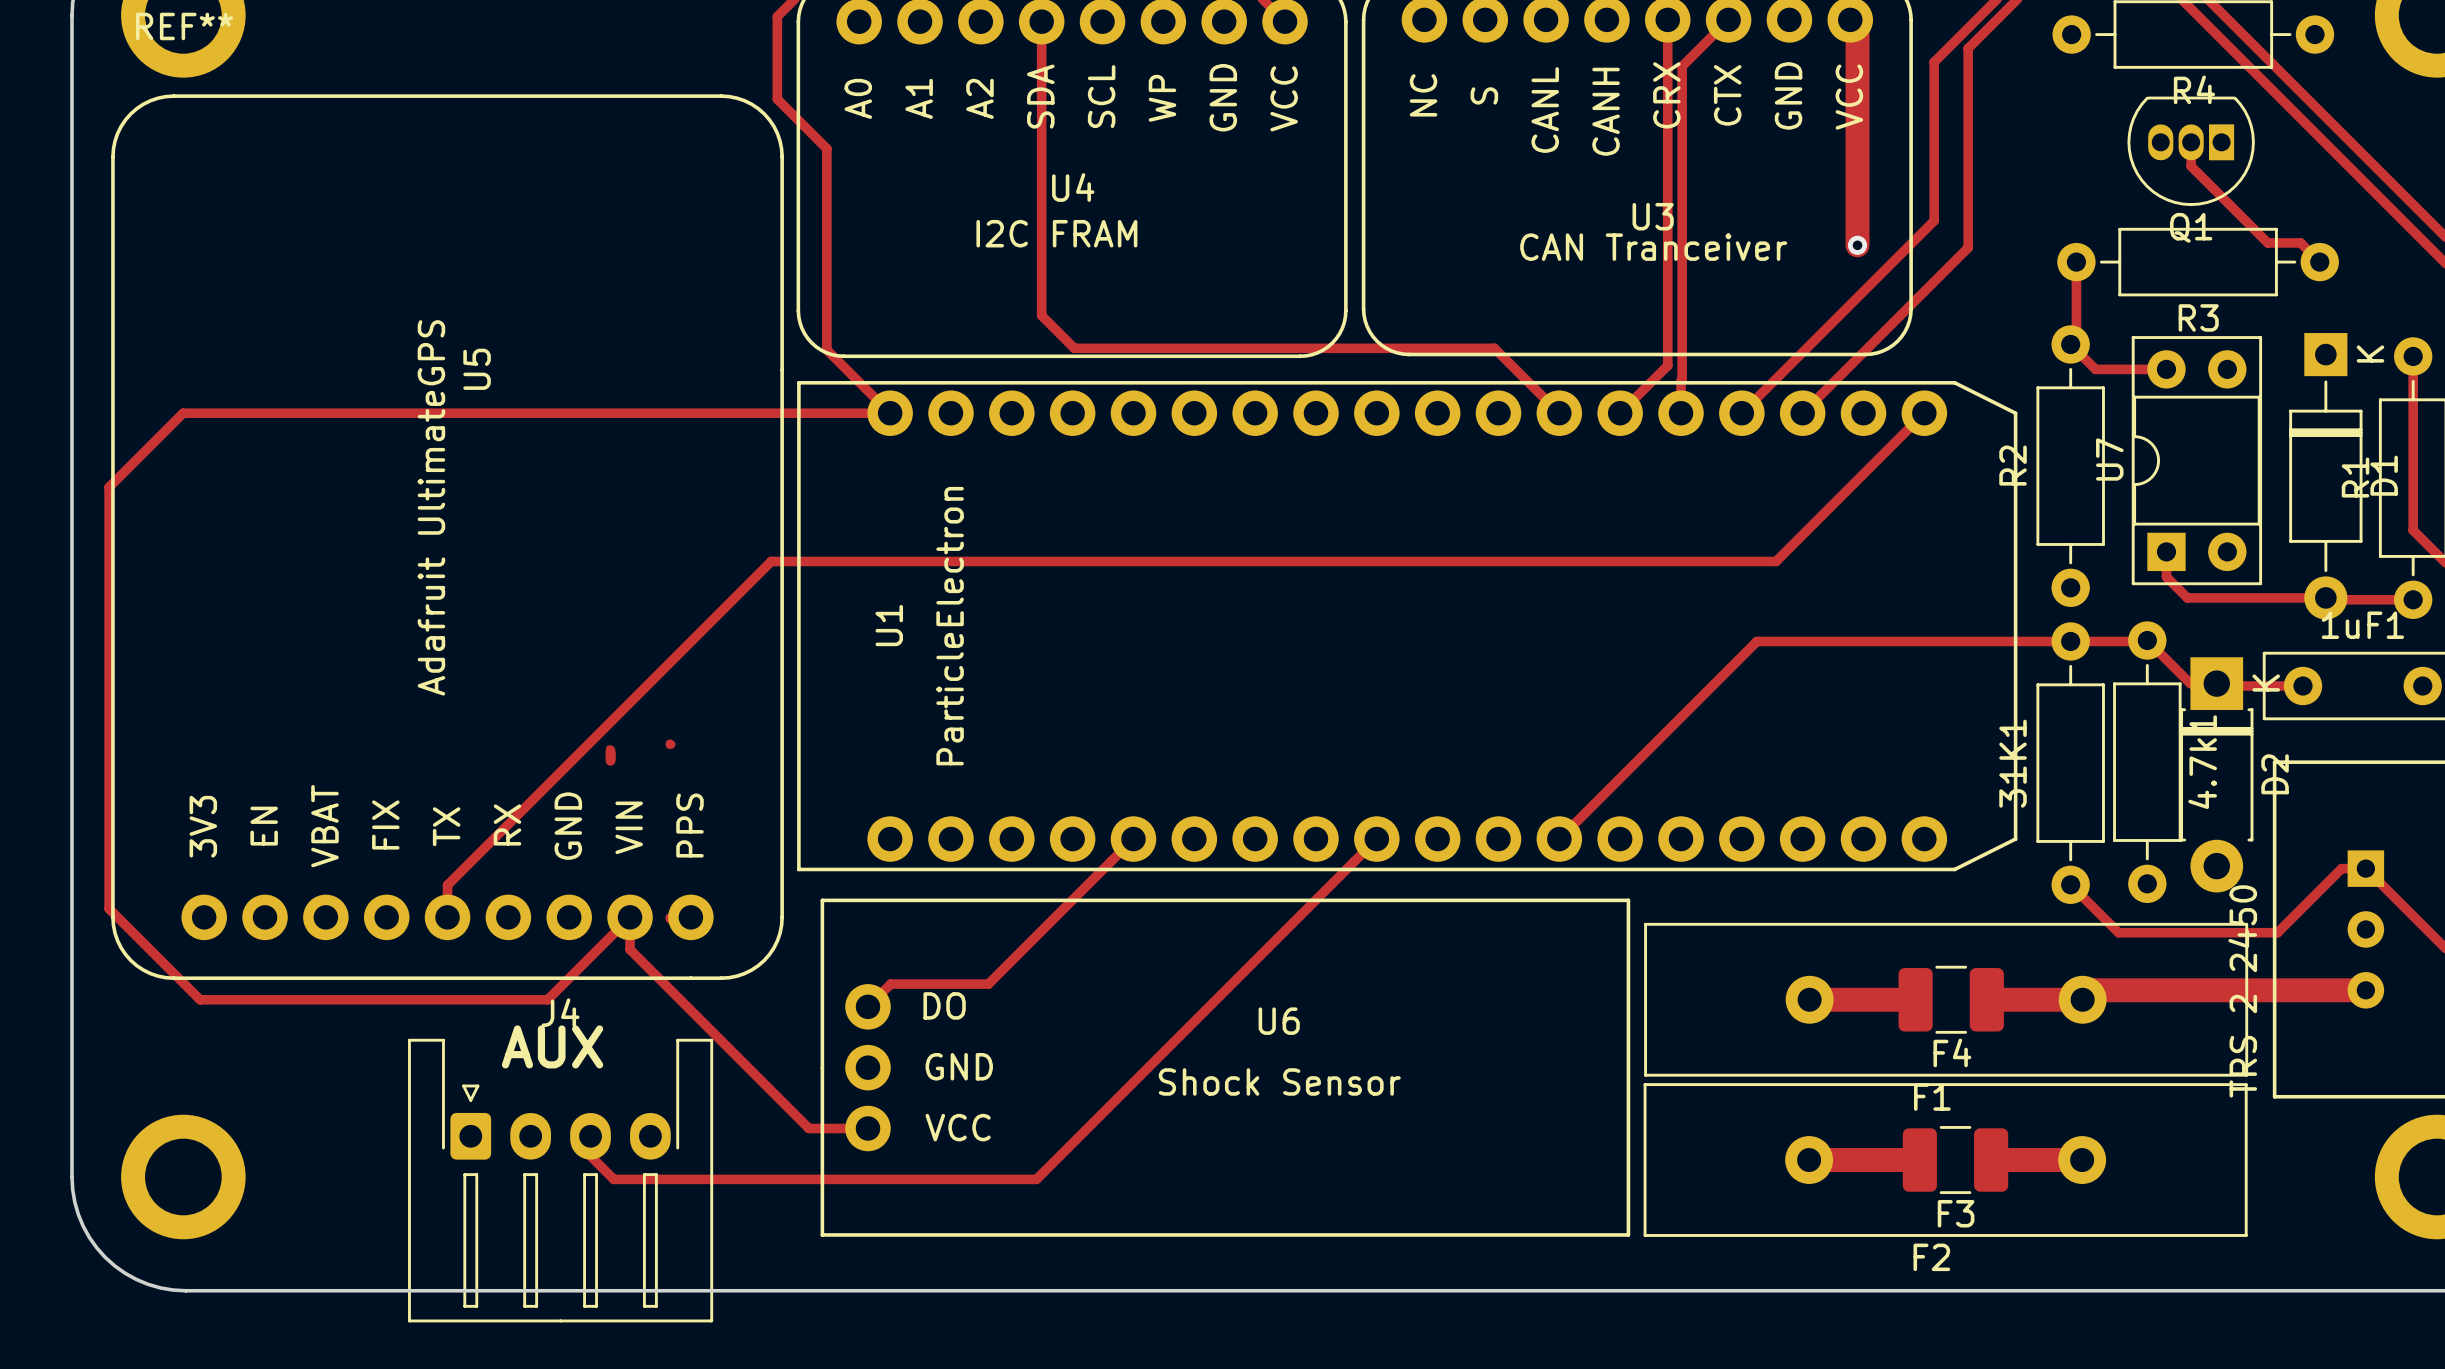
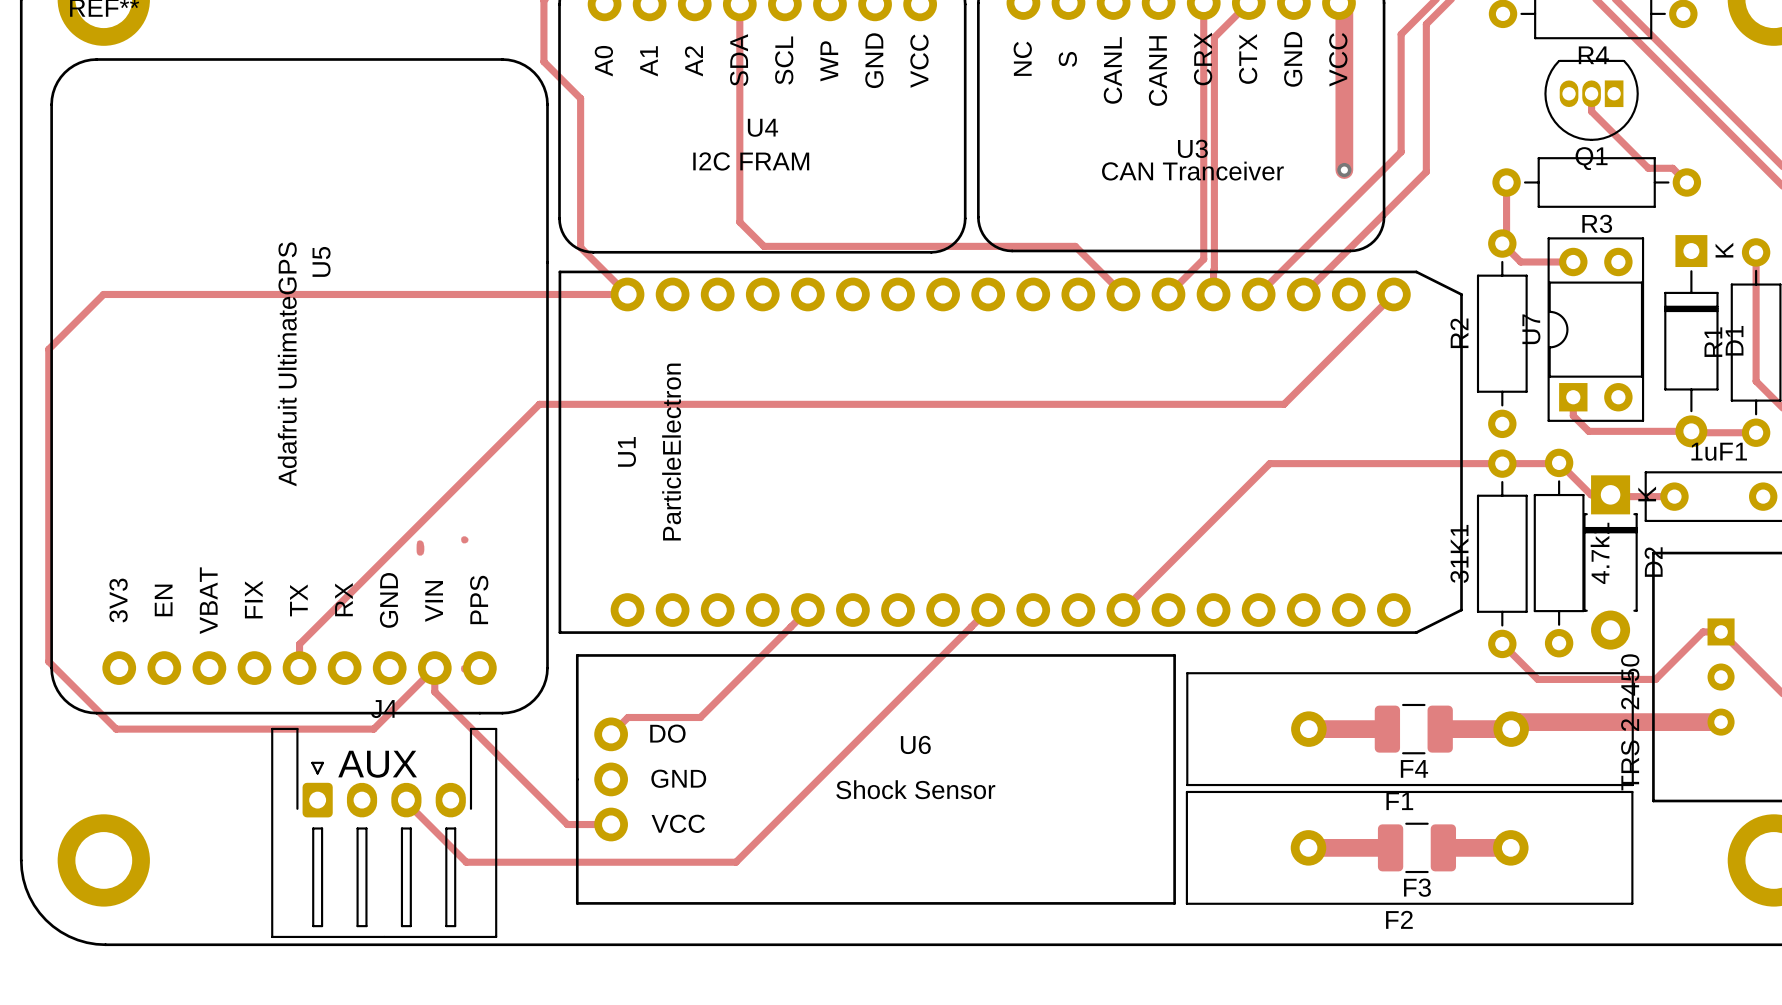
track: (585, 1148) (585, 1151) (613, 1179) (672, 1179) -> (406, 800) (406, 802) (466, 862)
J4 position: (560, 1180) -> (384, 832)

